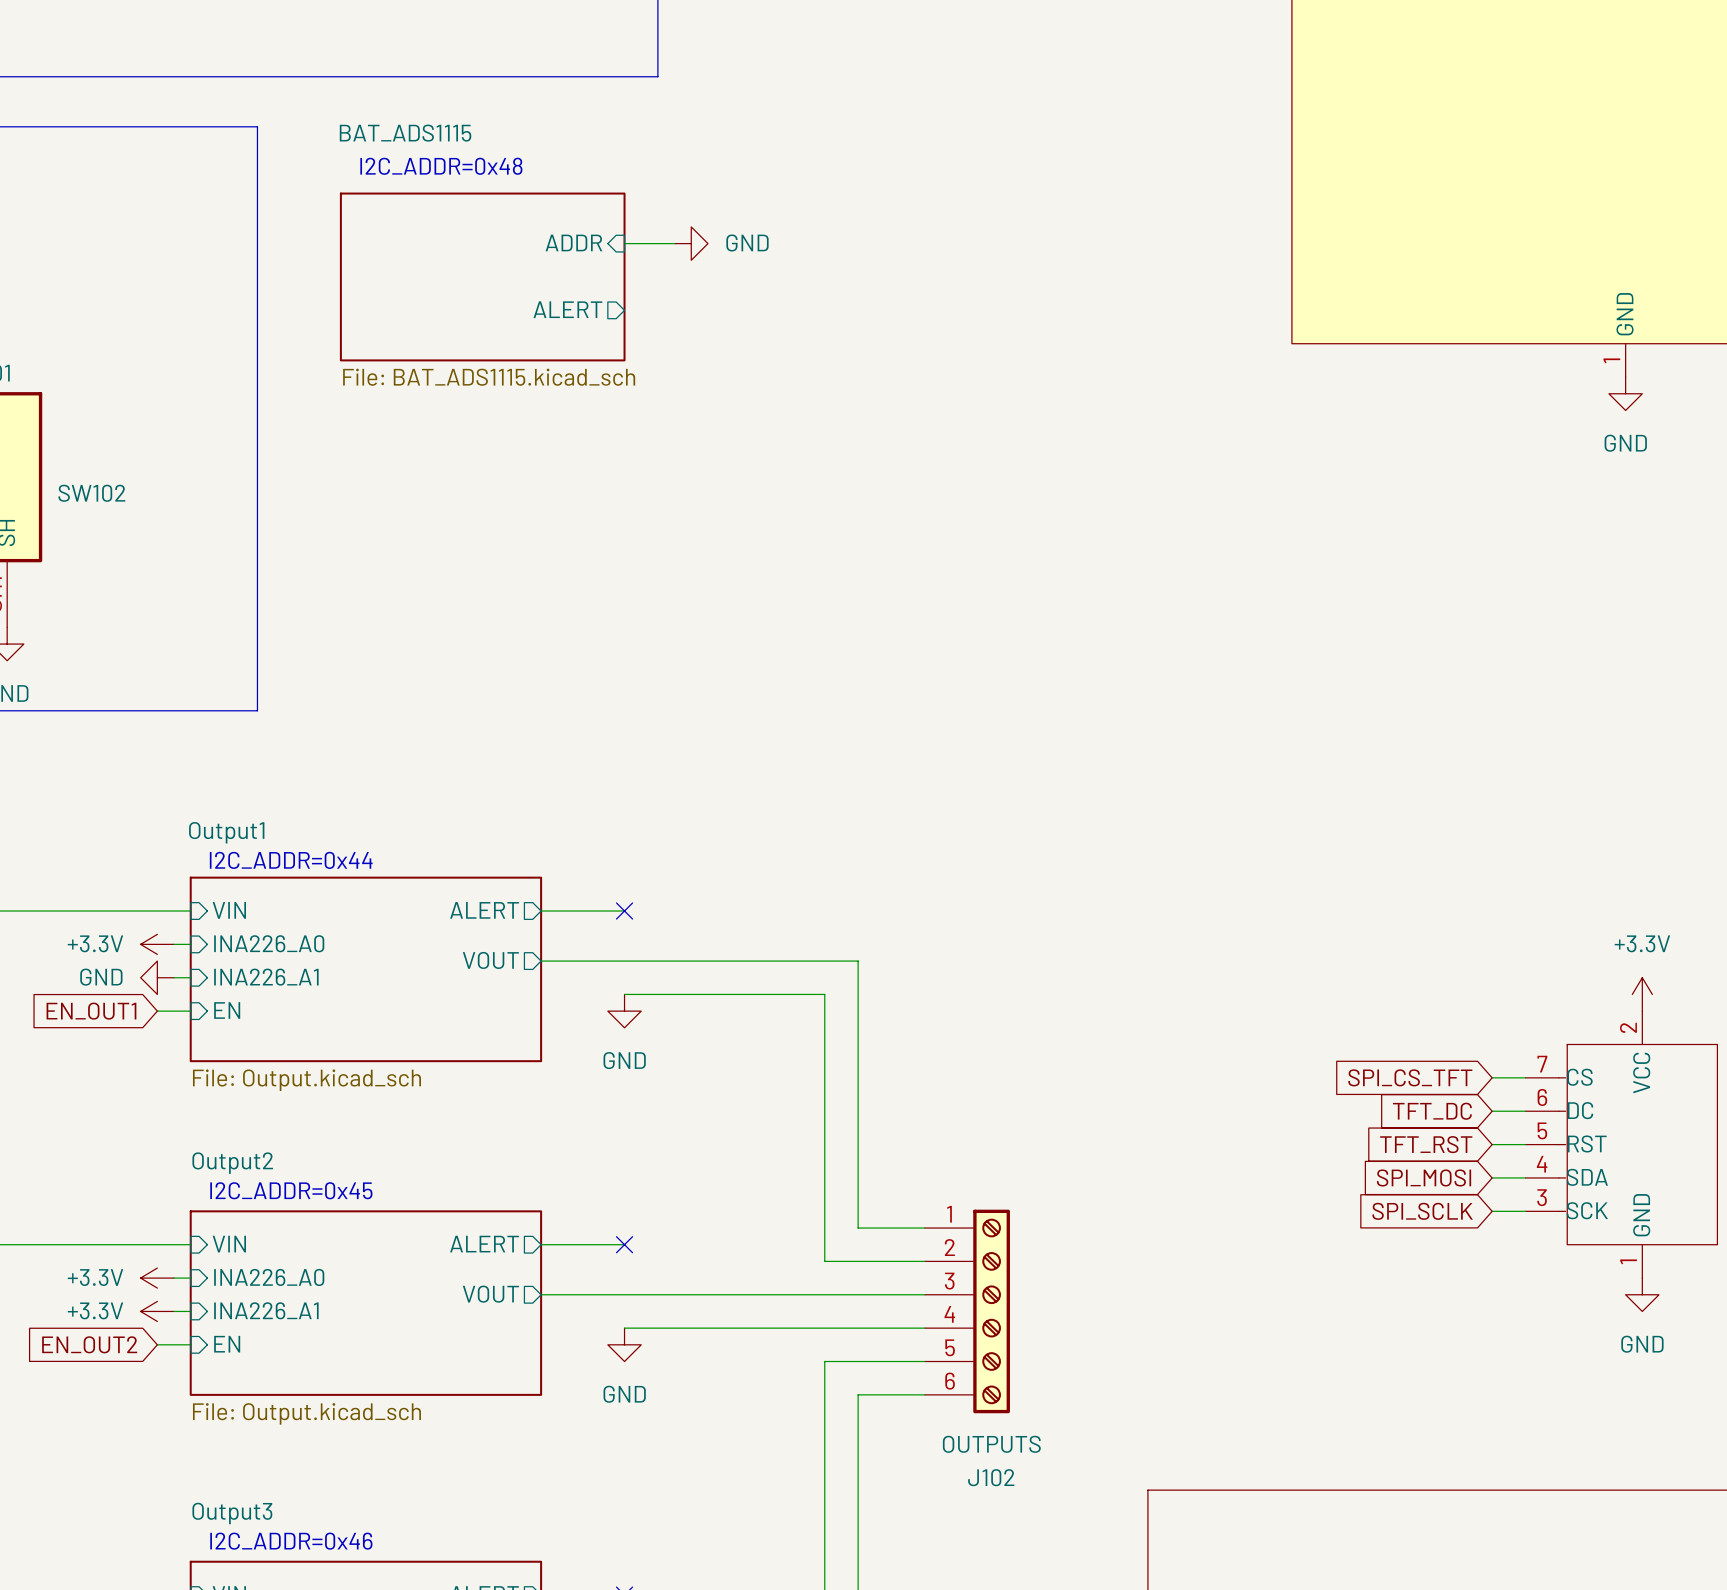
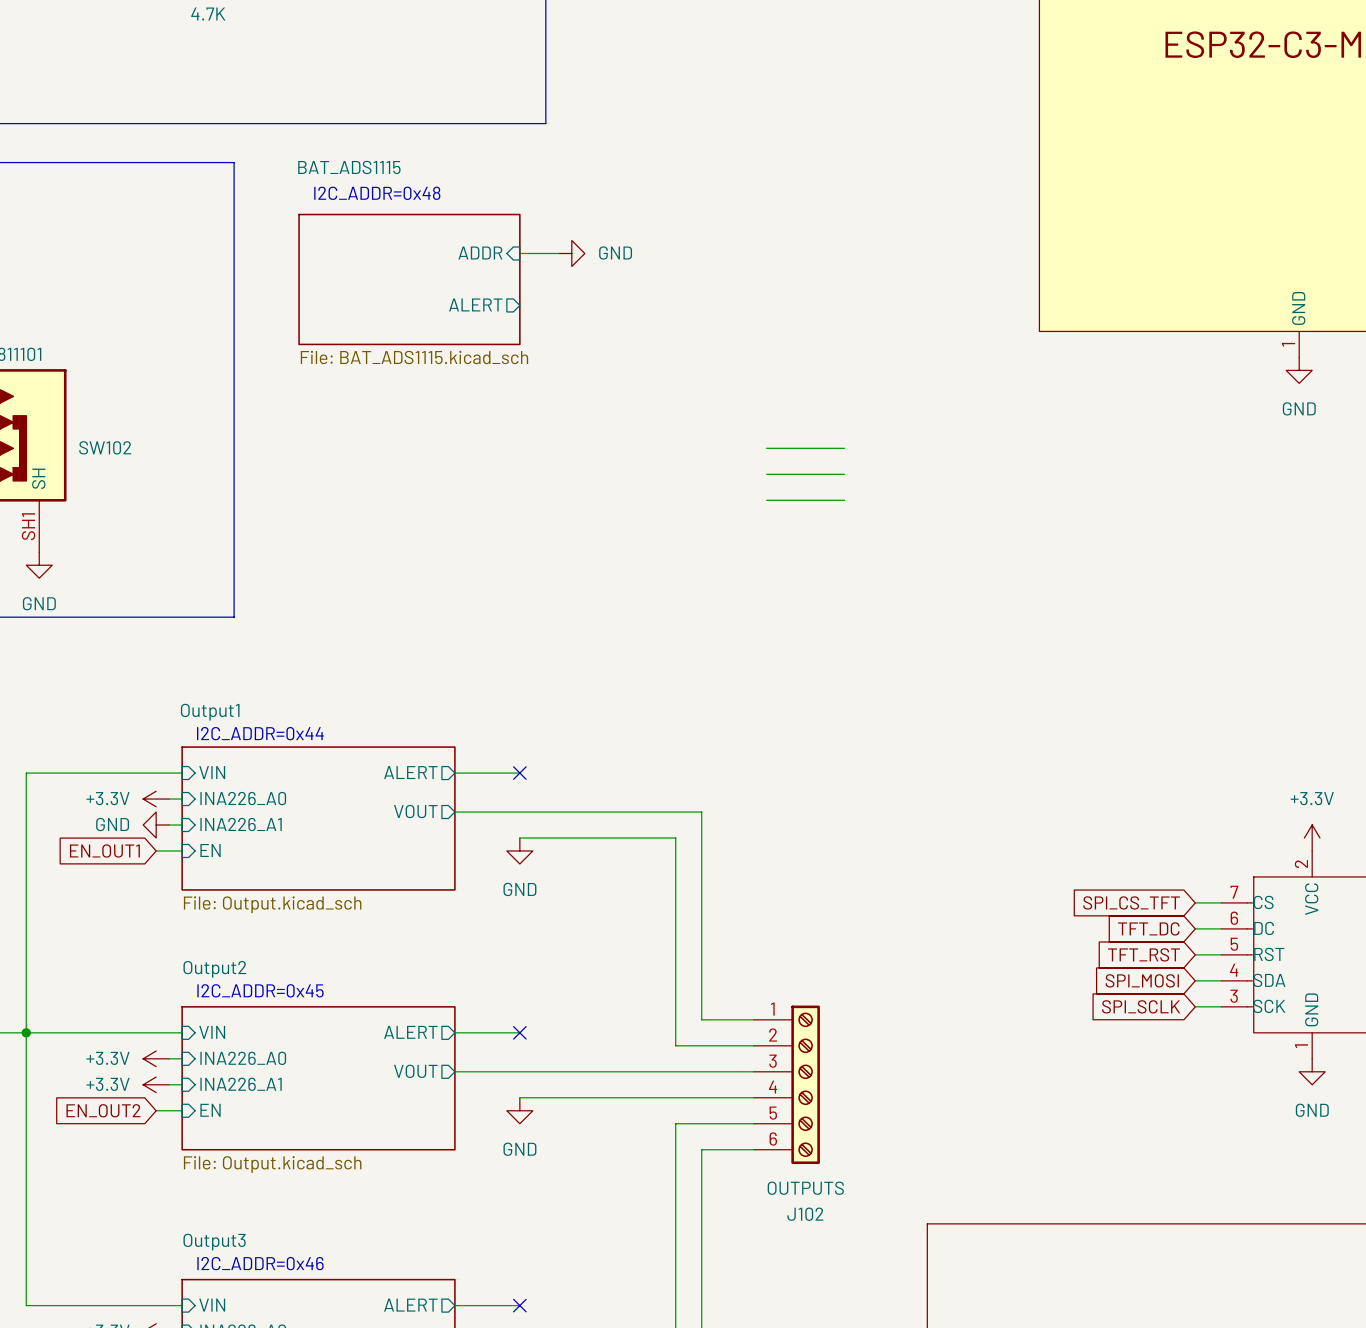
wire: none -> (766, 448) (844, 448)
wire: none -> (766, 474) (844, 474)
wire: none -> (766, 500) (844, 500)

